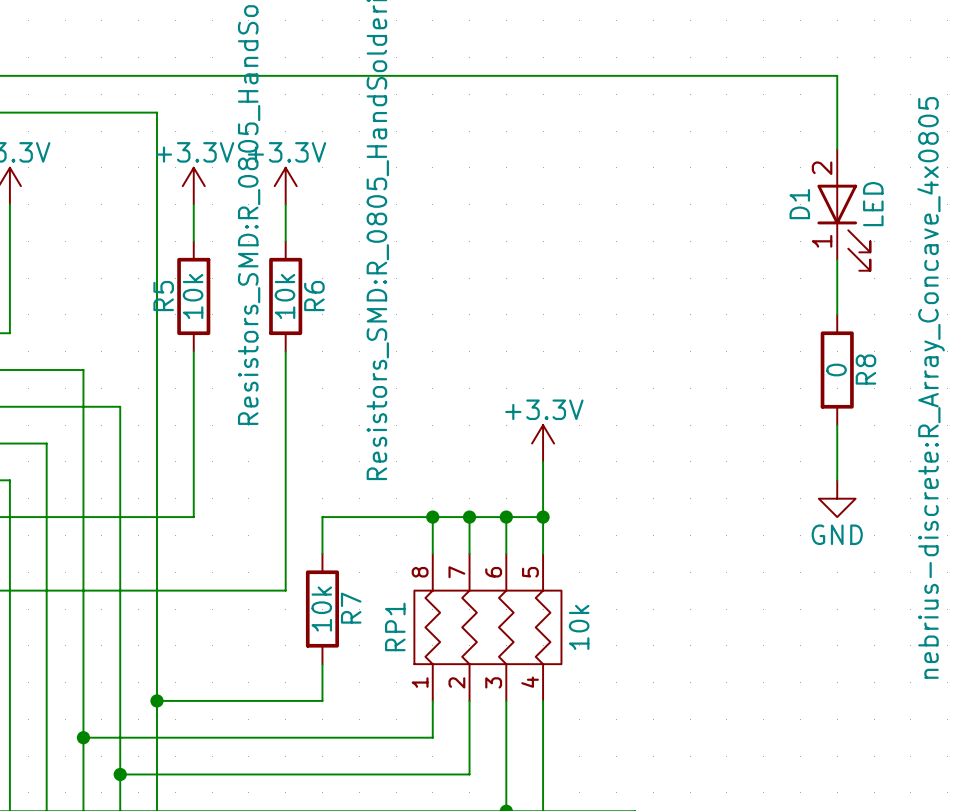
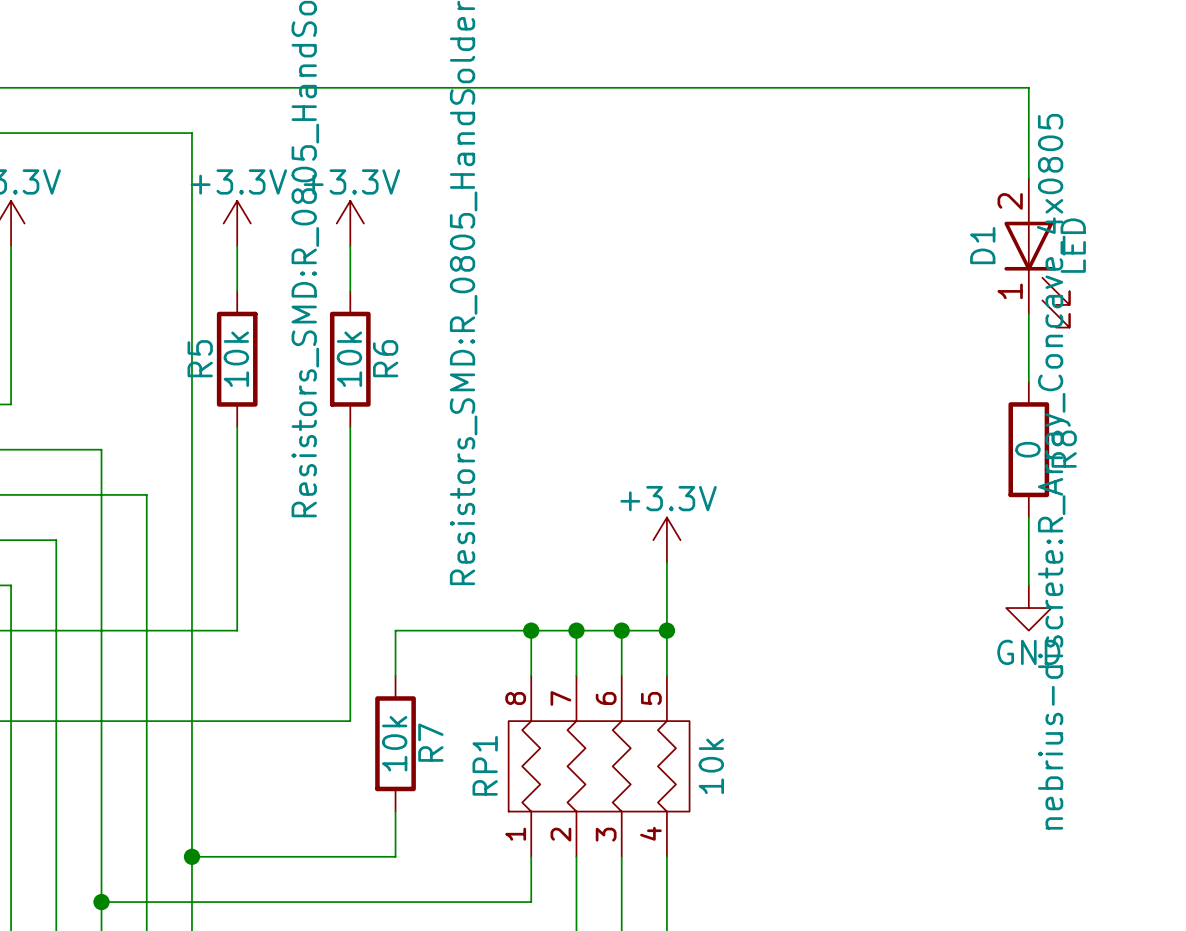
RP1 text position: nebrius-discrete:R_Array_Concave_4x0805 (931, 387) -> nebrius-discrete:R_Array_Concave_4x0805 (1053, 471)

